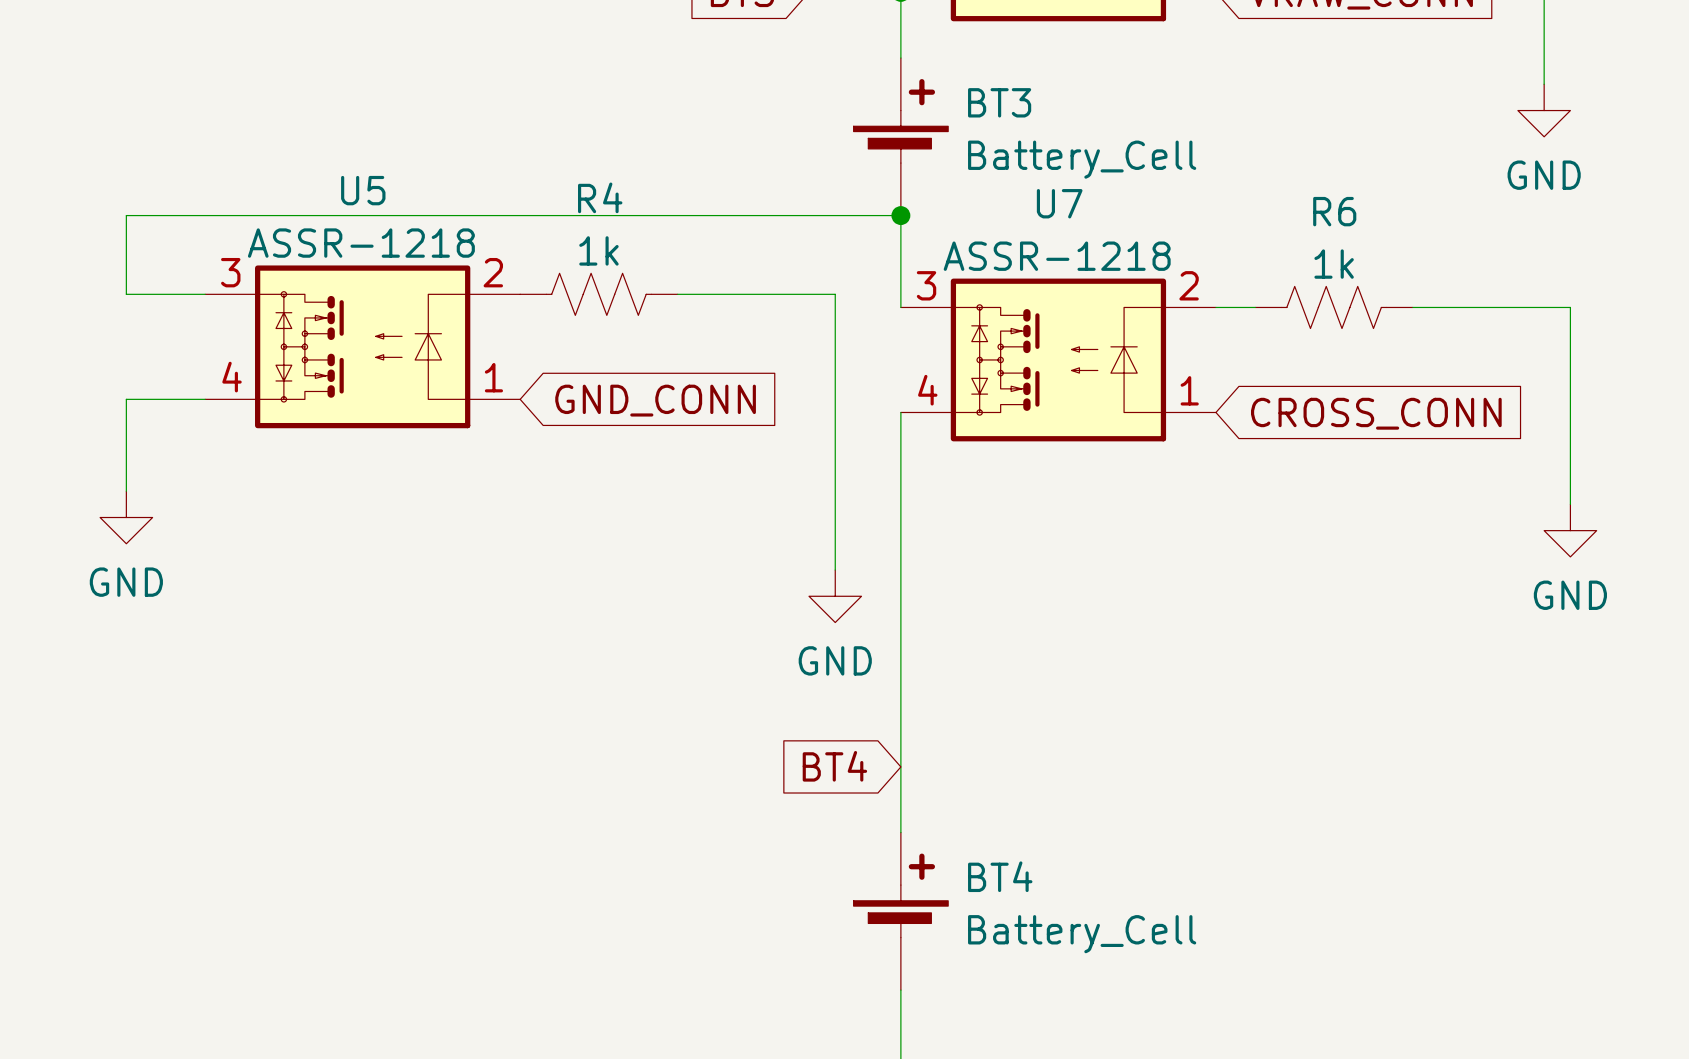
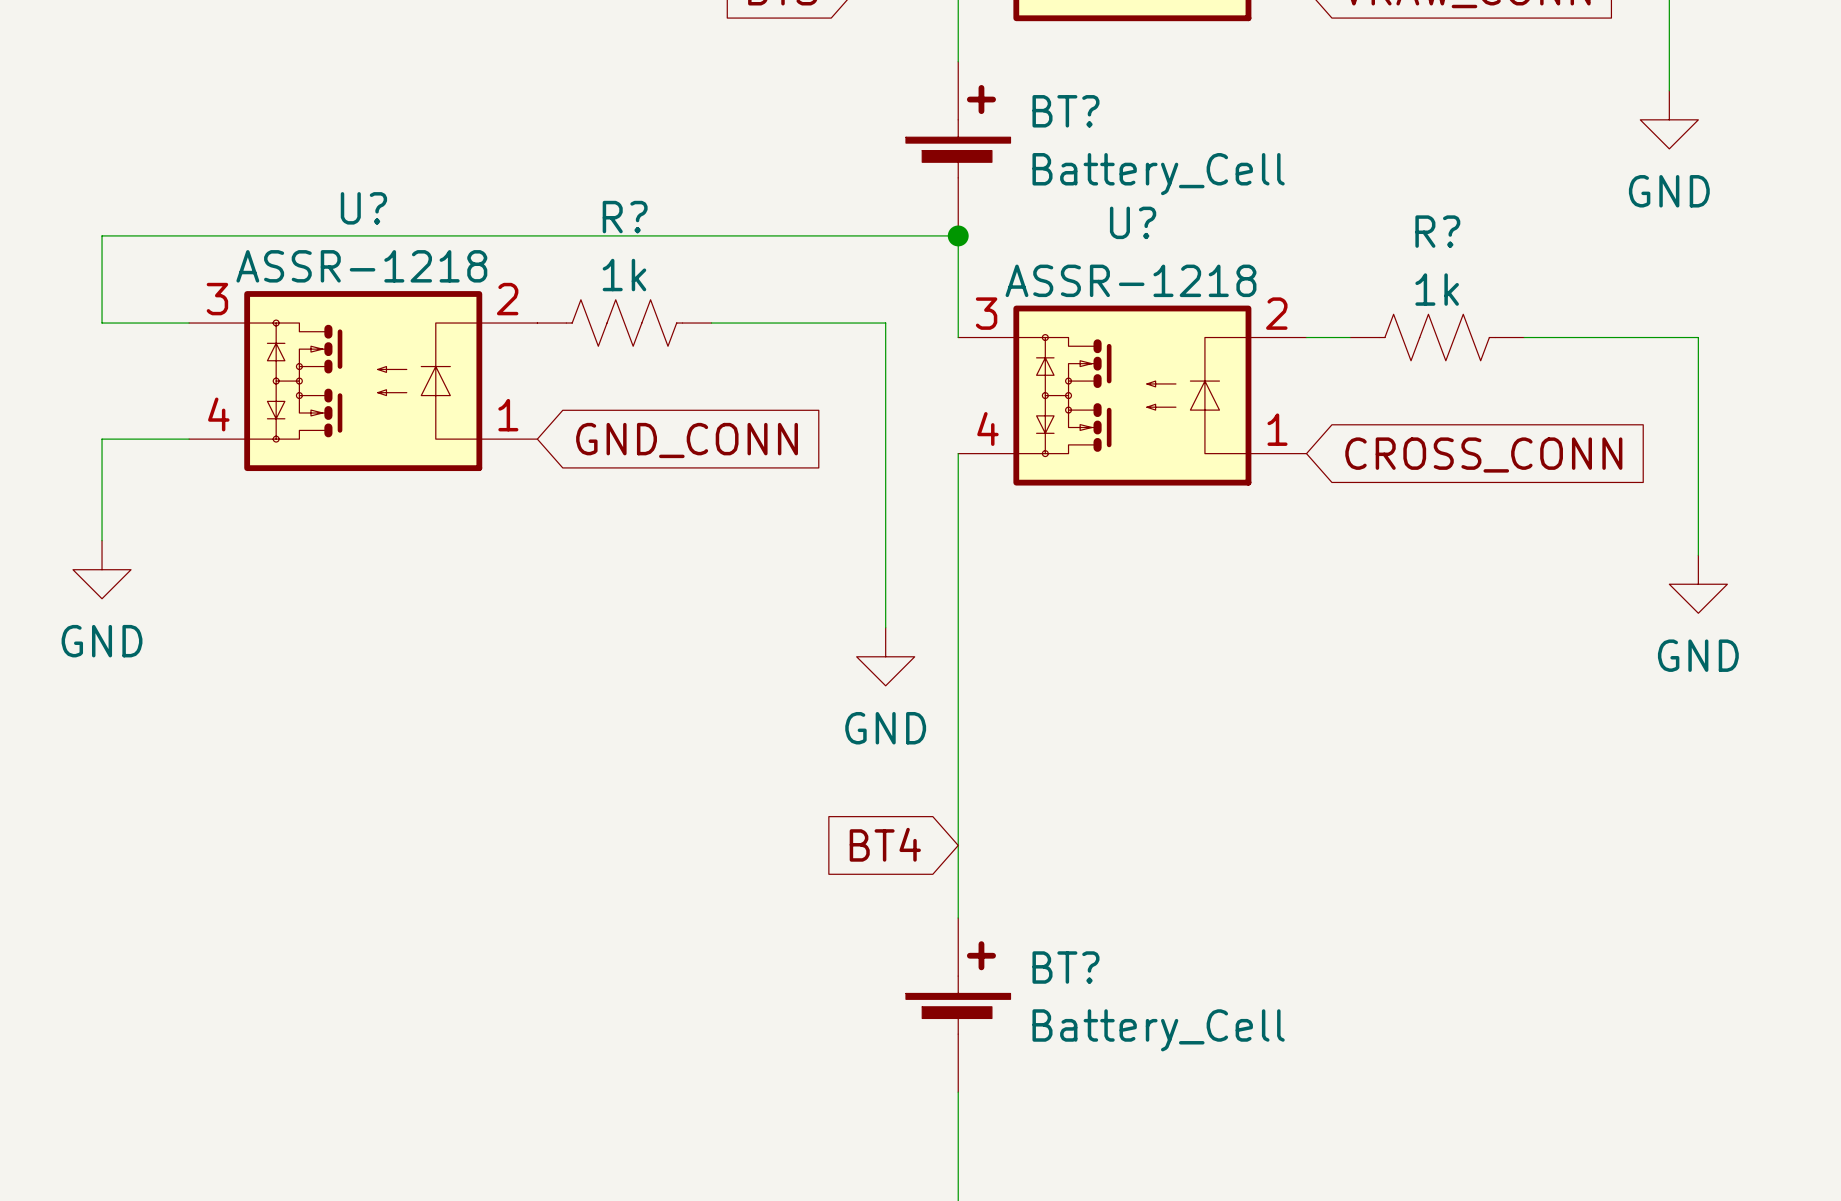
BT3 name: BT3 (999, 102) -> BT? (1065, 111)
U5 name: U5 (363, 190) -> U? (363, 208)
R4 name: R4 (600, 197) -> R? (625, 217)
U7 name: U7 (1059, 203) -> U? (1133, 222)
R6 name: R6 (1334, 211) -> R? (1437, 231)
BT4 name: BT4 (1000, 876) -> BT? (1065, 967)

